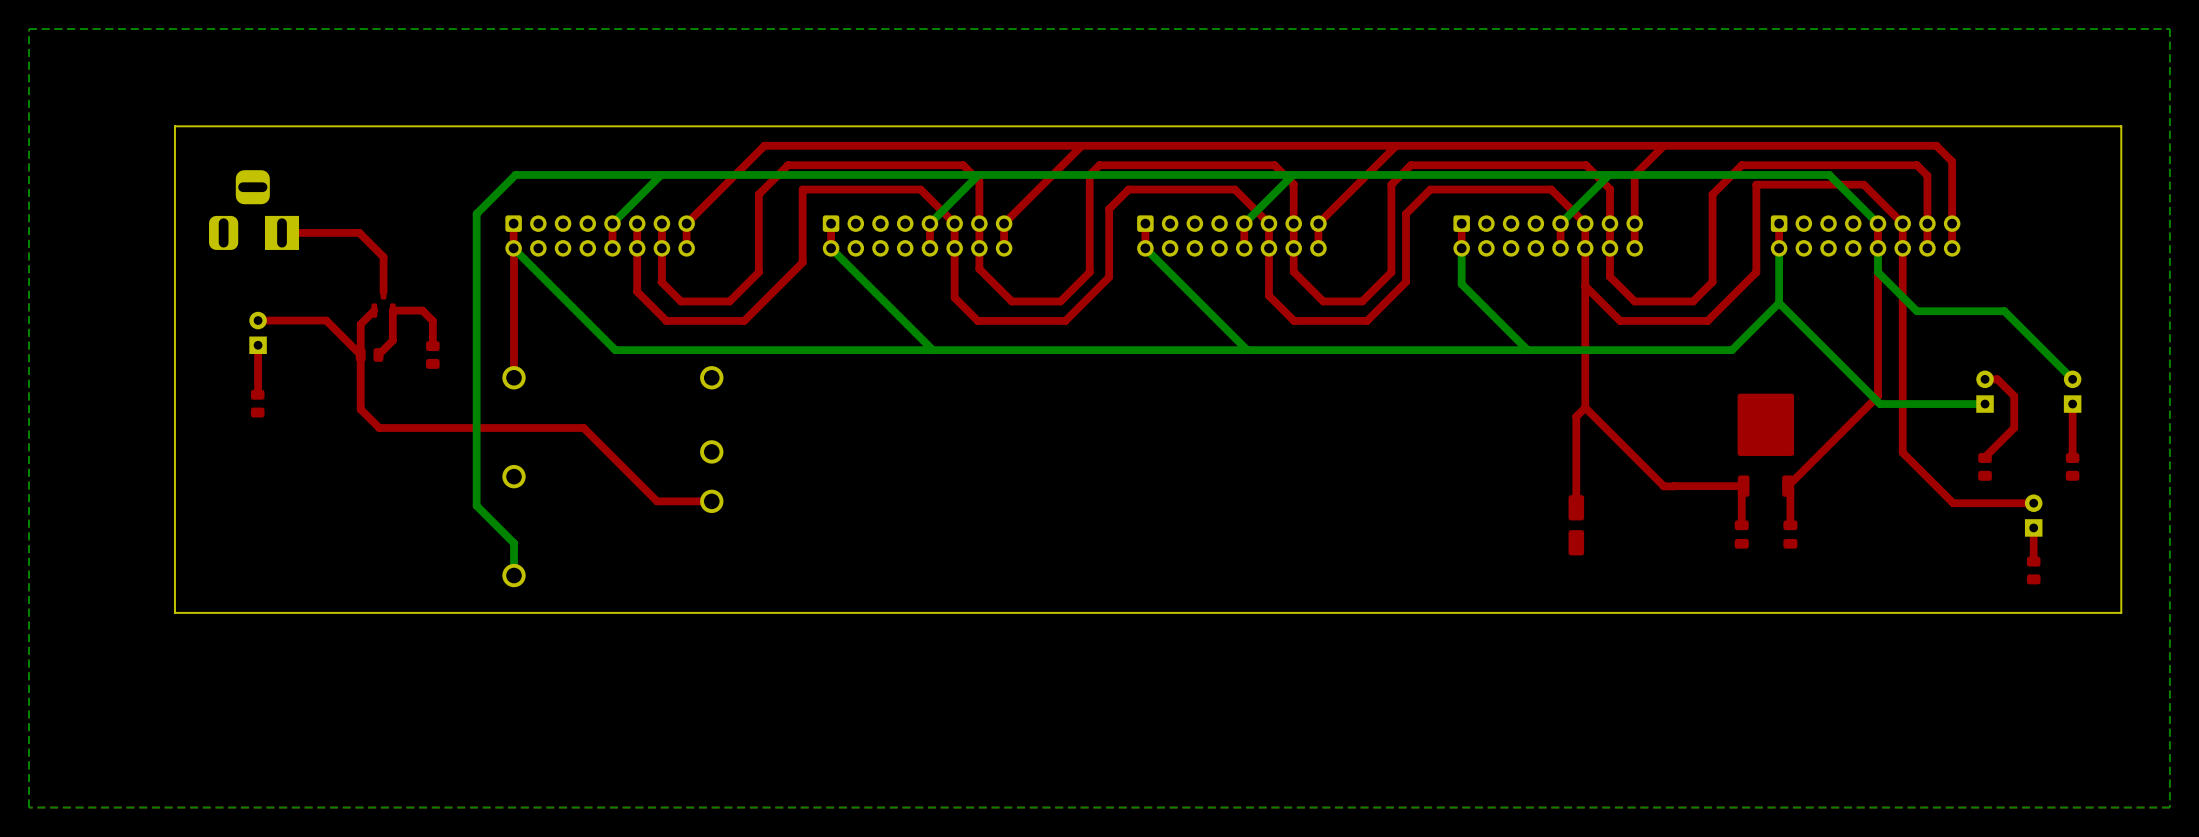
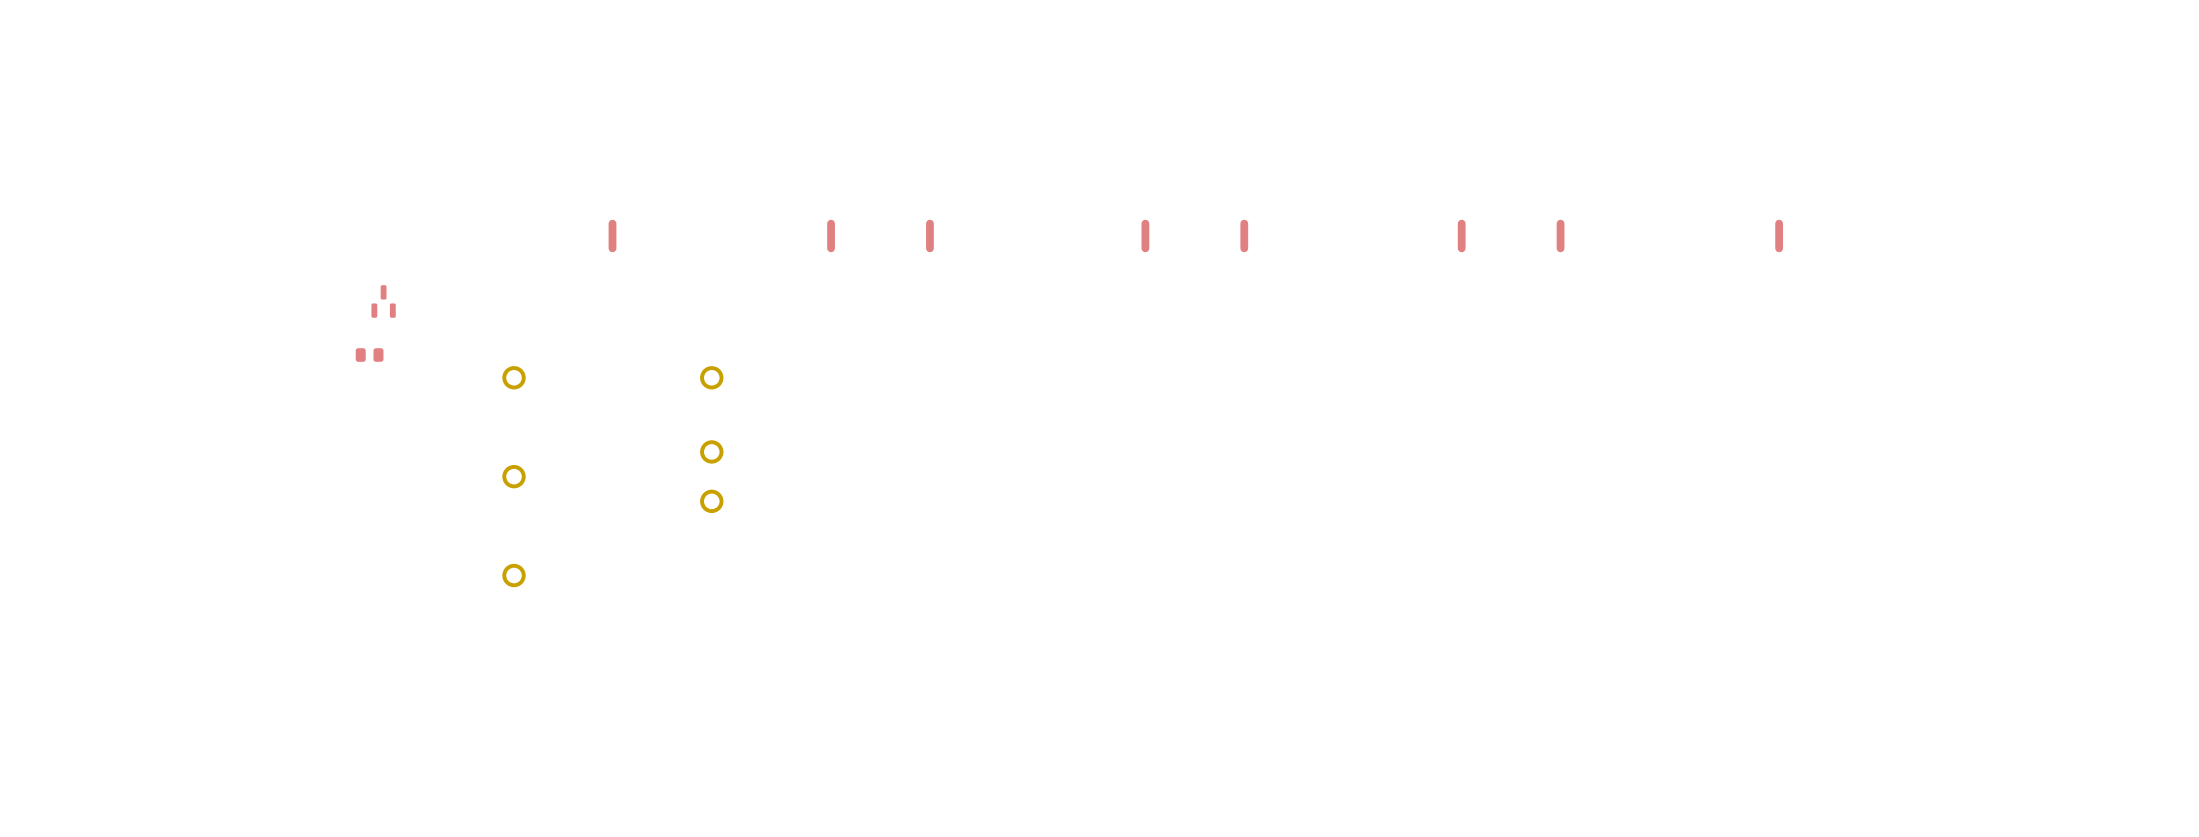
bottom zone outline: (2169, 28) (2169, 807) (28, 807) (28, 28) (2169, 28) -> none
board edge: (2121, 126) (174, 126) (174, 612) (2121, 612) (2121, 126) -> none
top track: (1081, 145) (1004, 223) (1004, 248) -> none
top track: (1396, 145) (1318, 223) (1318, 248) -> none
top track: (1663, 145) (1634, 174) (1634, 248) -> none
bottom track: (661, 174) (612, 223) -> none
bottom track: (978, 174) (929, 223) -> none
bottom track: (1292, 174) (1244, 223) -> none
bottom track: (1609, 174) (1560, 223) -> none
part: (254, 210) -> none
top track: (513, 223) (514, 377) -> none
top track: (637, 223) (637, 291) (666, 320) (744, 320) (802, 262) (802, 189) (920, 189) (954, 223) (954, 297) (977, 320) (1065, 320) (1109, 277) (1109, 209) (1128, 189) (1234, 189) (1268, 223) (1268, 295) (1294, 320) (1367, 320) (1406, 282) (1406, 213) (1430, 189) (1551, 189) (1585, 223) (1585, 407) -> none
top track: (661, 223) (661, 282) (681, 301) (729, 301) (758, 272) (758, 194) (788, 165) (963, 165) (979, 181) (979, 268) (1011, 301) (1060, 301) (1089, 272) (1089, 174) (1099, 165) (1274, 165) (1293, 184) (1293, 271) (1323, 301) (1362, 301) (1391, 272) (1391, 184) (1410, 165) (1586, 165) (1609, 189) (1609, 276) (1634, 301) (1693, 301) (1712, 282) (1712, 194) (1741, 165) (1916, 165) (1927, 175) (1927, 248) -> none
top track: (1877, 223) (1877, 396) (1788, 486) (1790, 488) (1790, 525) -> none
bottom track: (1877, 223) (1829, 174) (515, 174) (476, 213) (476, 505) (514, 543) (514, 575) -> none
top track: (282, 232) (359, 232) (383, 257) (383, 292) -> none
part: (600, 235) -> none
part: (917, 235) -> none
part: (1231, 235) -> none
part: (1548, 235) -> none
part: (1865, 235) -> none
bottom track: (513, 248) (615, 350) (1732, 350) (1779, 303) -> none
bottom track: (831, 248) (932, 350) -> none
bottom track: (1145, 248) (1247, 350) -> none
bottom track: (1461, 248) (1461, 284) (1527, 350) -> none
bottom track: (1779, 248) (1779, 303) -> none
bottom track: (1877, 248) (1877, 272) (1916, 311) (2004, 311) (2072, 379) -> none
top track: (1952, 248) (1952, 161) (1936, 145) (764, 145) (686, 223) (686, 248) -> none
top track: (1585, 286) (1620, 320) (1707, 320) (1756, 272) (1756, 184) (1863, 184) (1902, 223) (1902, 452) (1953, 503) (2033, 503) -> none
bottom track: (1779, 303) (1880, 404) (1985, 404) -> none
top track: (374, 310) (360, 324) (360, 409) (379, 427) (583, 427) (657, 501) (711, 501) -> none
top track: (258, 320) (326, 320) (360, 355) -> none
part: (258, 332) -> none
top track: (258, 345) (257, 394) -> none
top track: (432, 346) (432, 320) (422, 310) (392, 310) (392, 340) (378, 355) -> none
part: (432, 355) -> none
top track: (1985, 379) (1997, 379) (2014, 396) (2014, 427) (1985, 458) -> none
part: (1985, 391) -> none
part: (2072, 391) -> none
part: (257, 403) -> none
top track: (2072, 404) (2072, 458) -> none
top track: (1585, 407) (1576, 416) (1576, 507) -> none
top track: (1585, 407) (1663, 486) (1743, 486) (1741, 488) (1741, 525) -> none
part: (1765, 445) -> none
part: (1985, 466) -> none
part: (2072, 466) -> none
part: (2033, 515) -> none
part: (1576, 525) -> none
top track: (2033, 527) (2033, 561) -> none
part: (1741, 534) -> none
part: (1790, 534) -> none
part: (2033, 570) -> none

